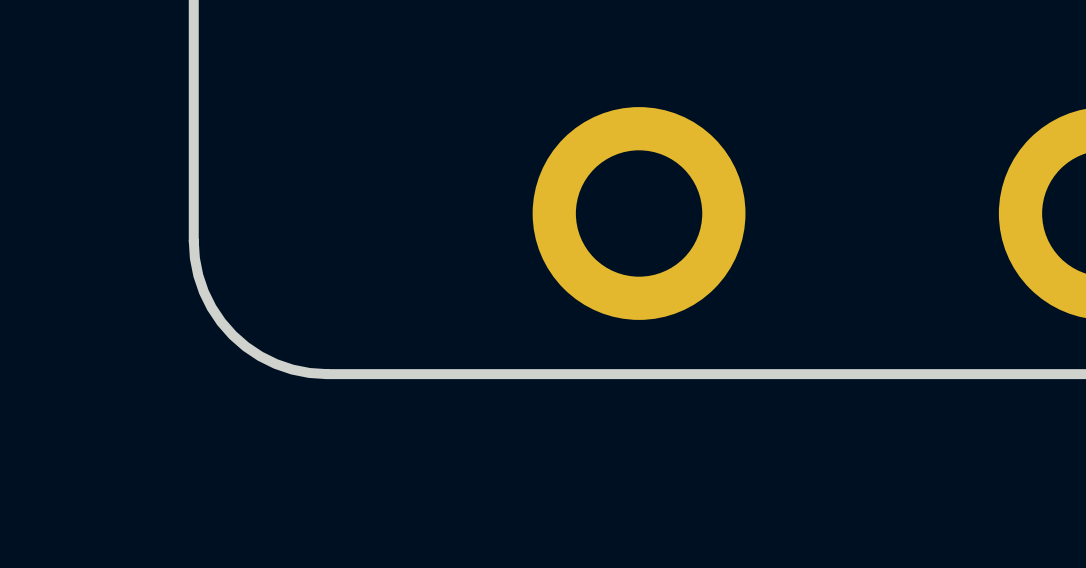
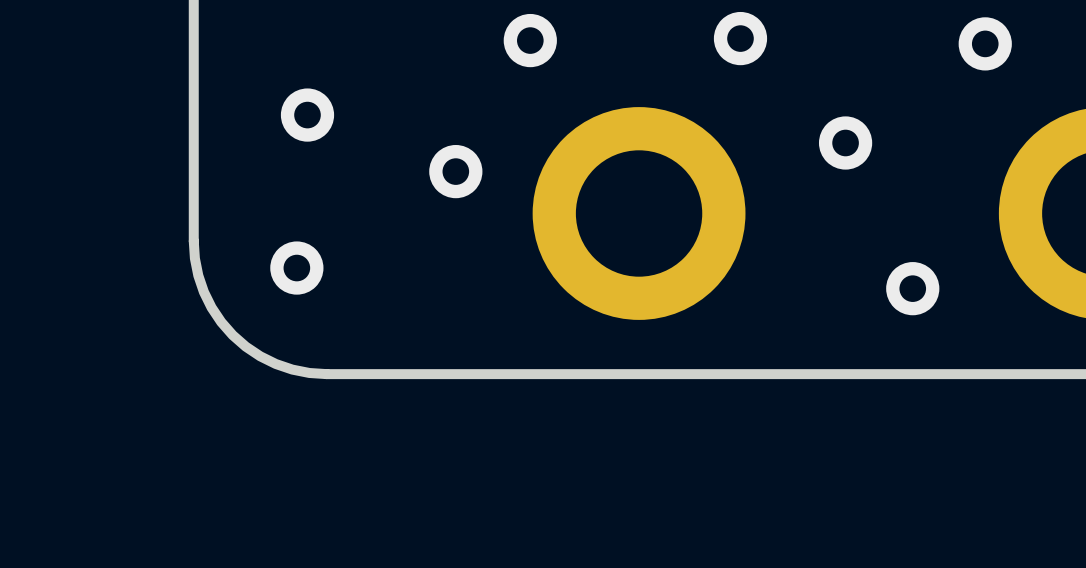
via: none -> (740, 38)
via: none -> (530, 40)
via: none -> (985, 43)
via: none -> (307, 115)
via: none -> (845, 142)
via: none -> (455, 171)
via: none -> (296, 268)
via: none -> (912, 288)

